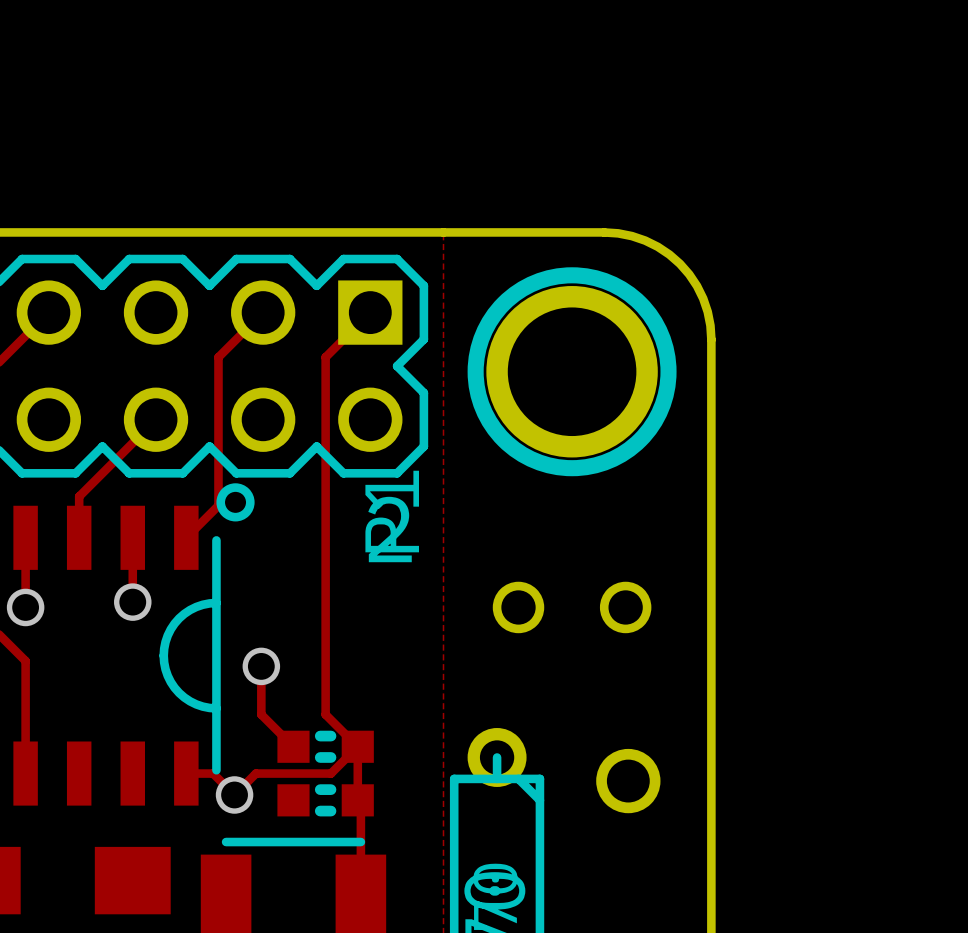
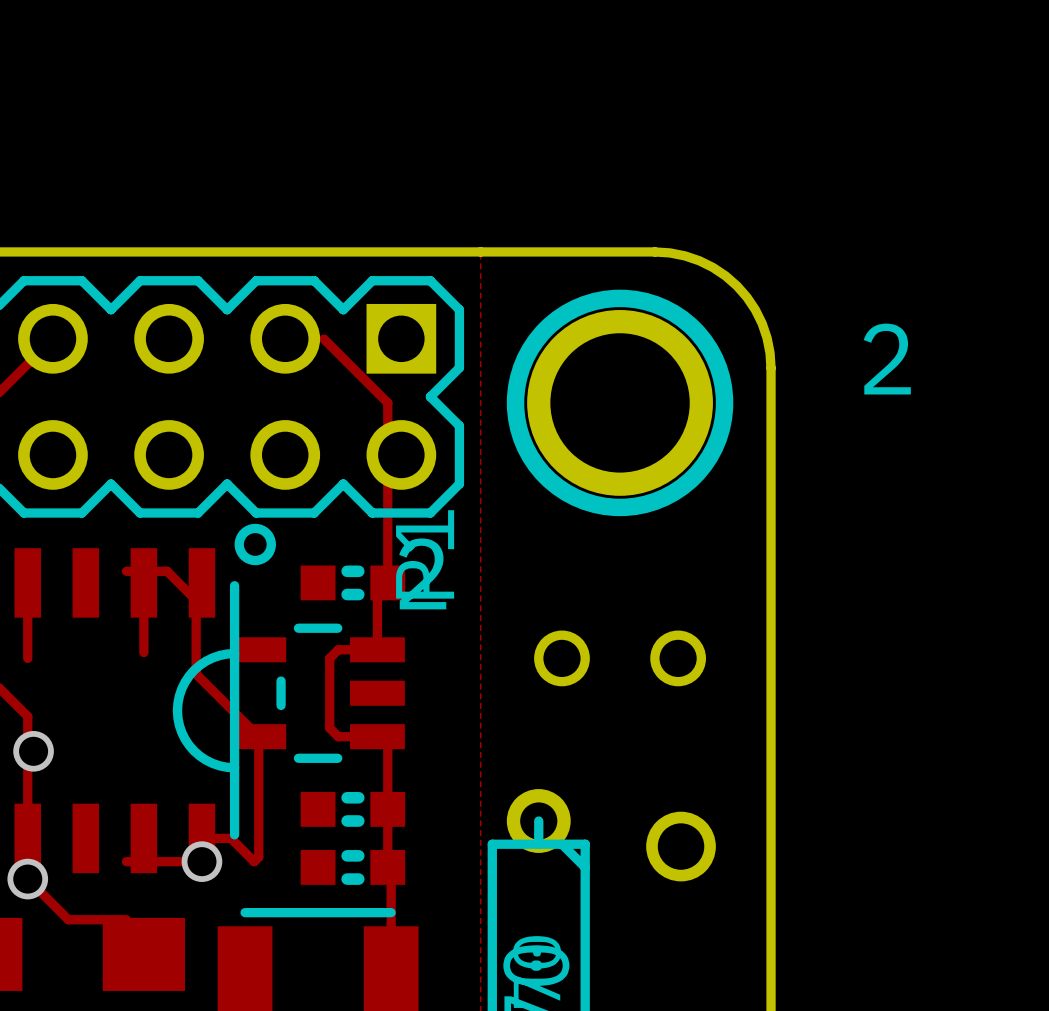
track: (263, 312) (218, 357) (218, 505) (186, 537) -> none
track: none -> (323, 339) (387, 402) (387, 582) (377, 593) (377, 649) (338, 649) (329, 658) (329, 728) (338, 736) (377, 736) (387, 747) (387, 809)
track: (370, 312) (325, 357) (325, 714) (357, 746) (330, 773) (255, 773) (238, 790) -> (126, 571) (167, 571) (196, 600) (196, 674) (258, 736) (258, 857)
text: none -> 2 (887, 359)
track: (156, 419) (79, 496) (79, 537) -> none
part: none -> (352, 582)
via: (132, 602) -> none
via: (25, 607) -> none
part: none -> (318, 693)
track: (261, 666) (261, 714) (293, 746) -> none
via: (261, 666) -> none
via: none -> (33, 751)
track: none -> (126, 861) (201, 861)
via position: (234, 794) -> (201, 861)
track: none -> (27, 879) (68, 919) (126, 919)
via: none -> (27, 879)

